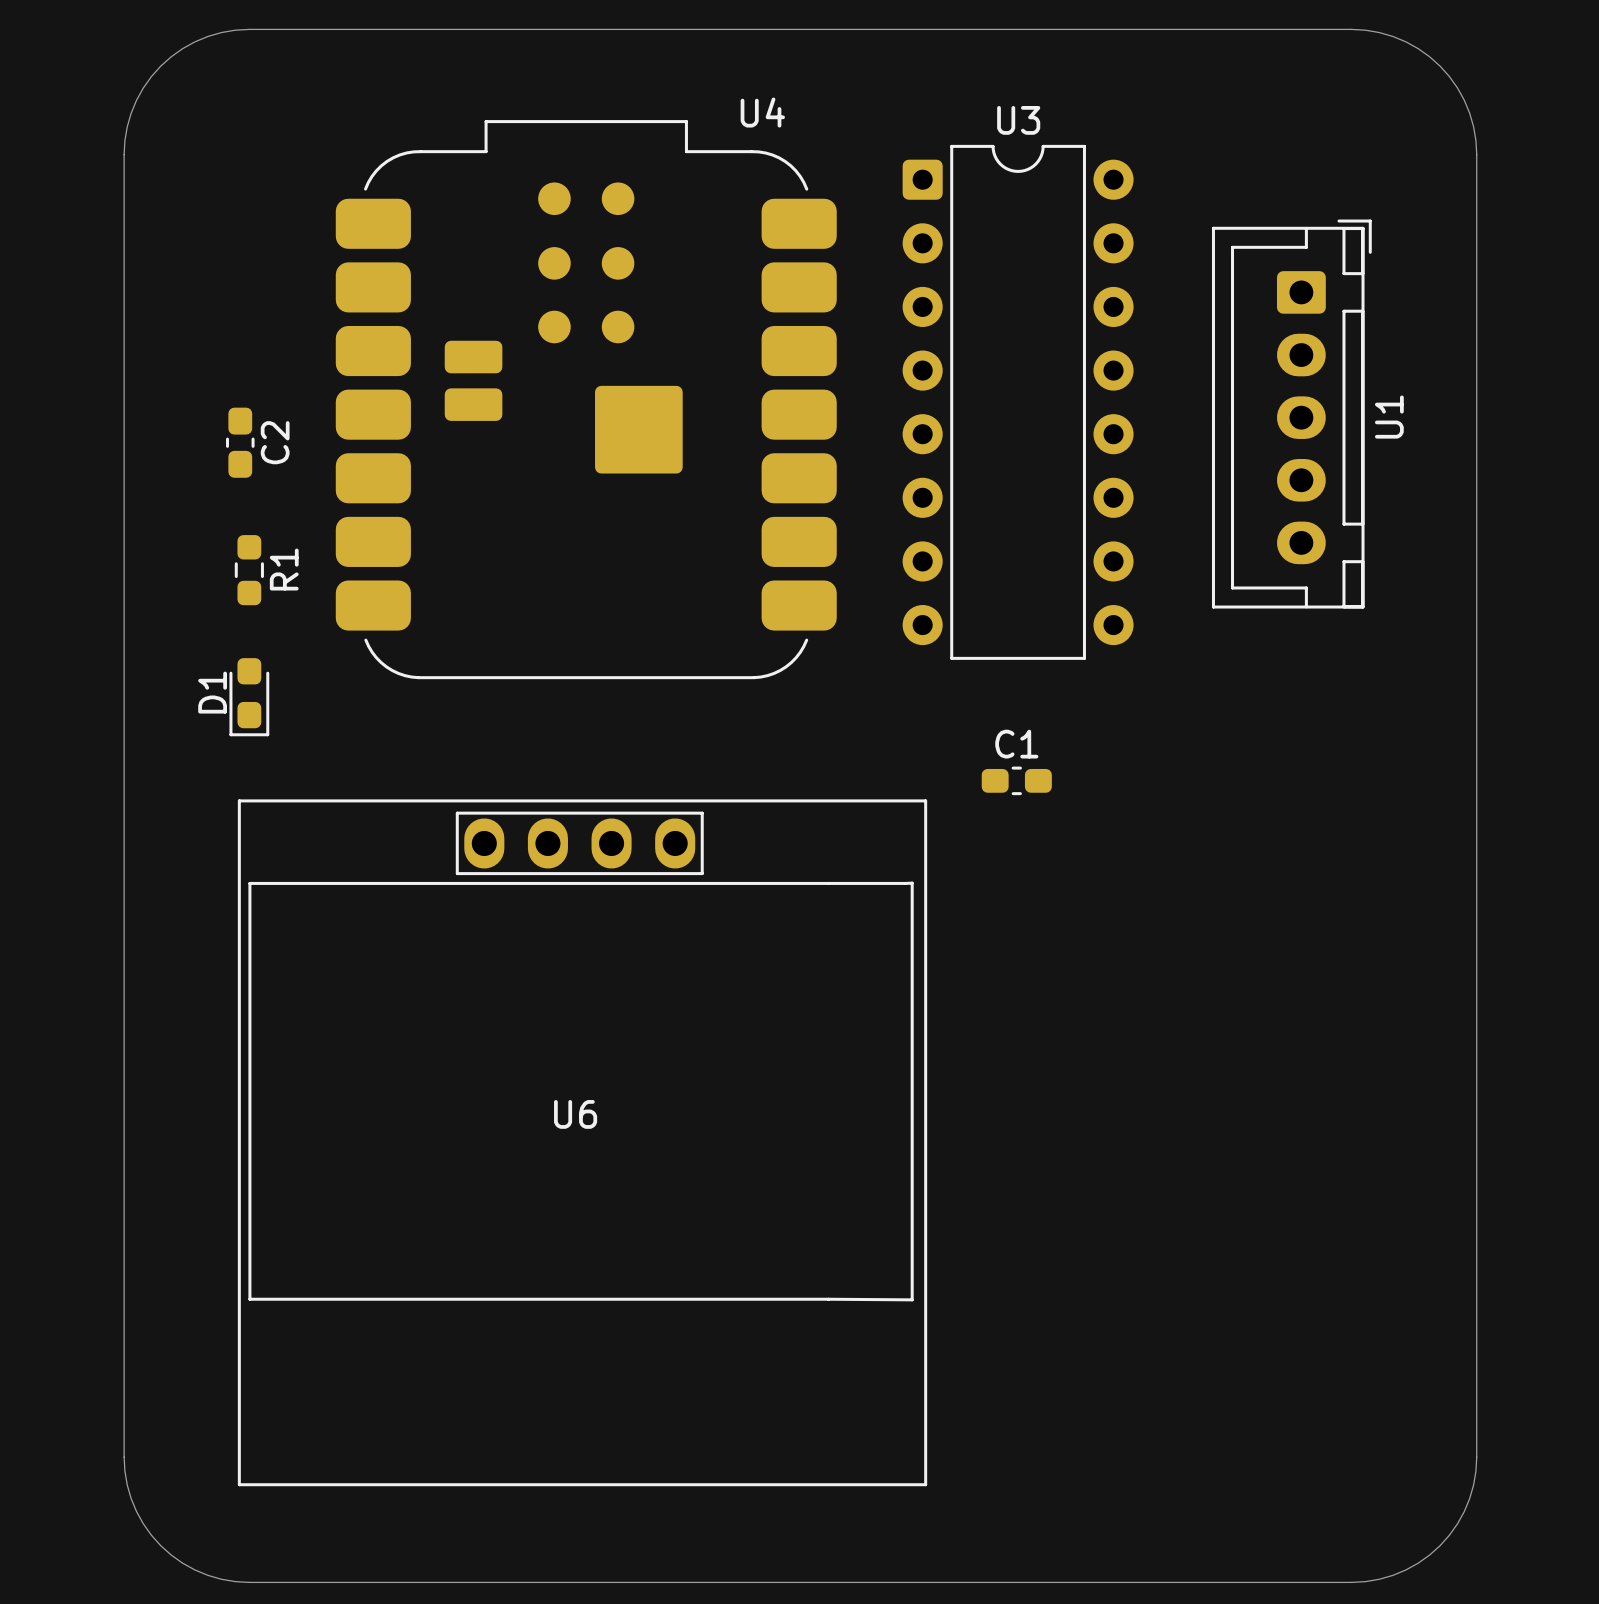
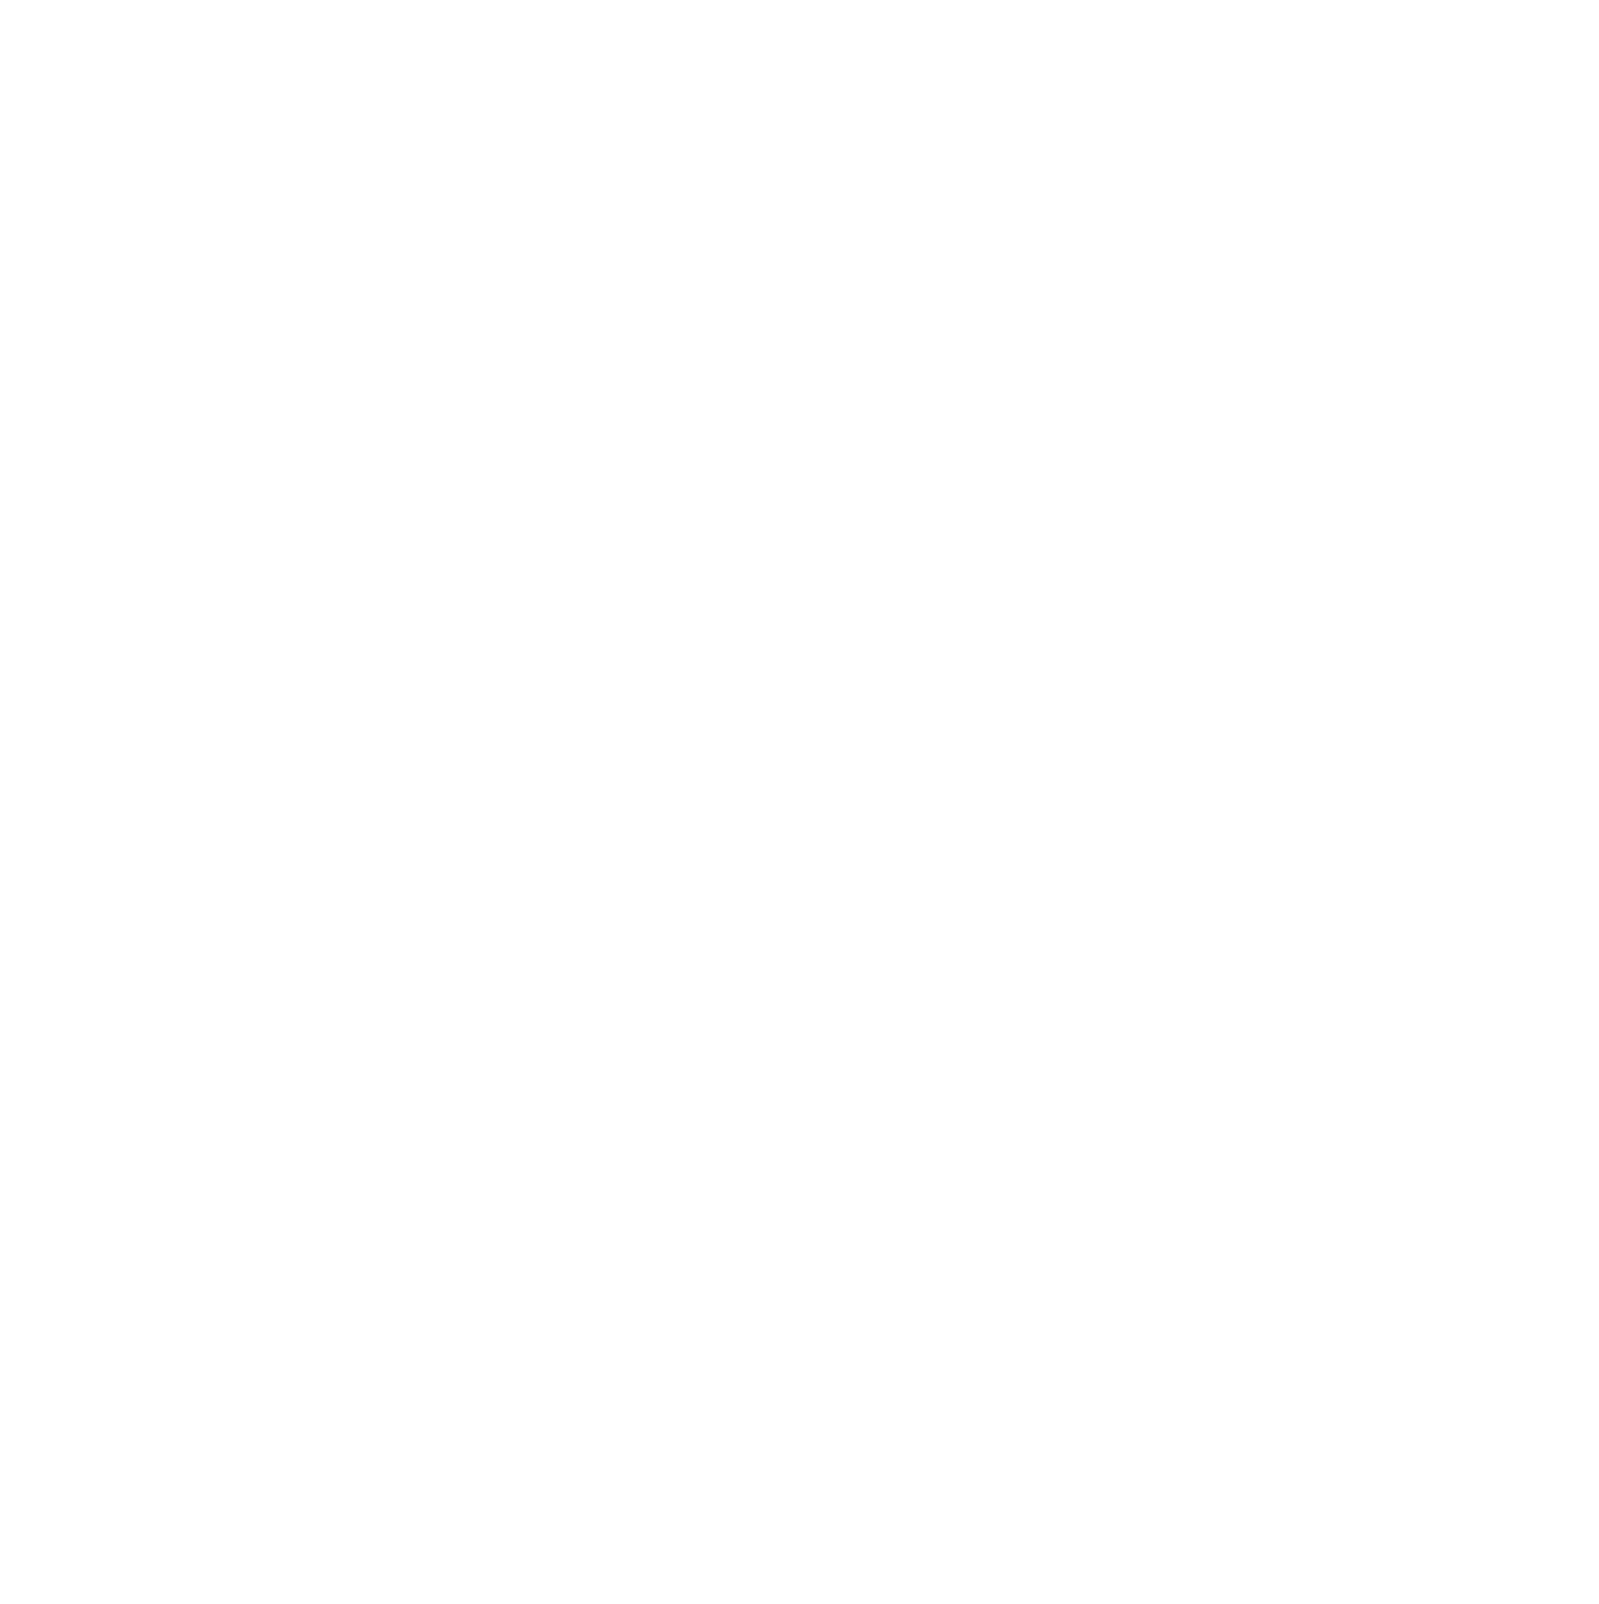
board edge: (249, 29) (1351, 29) (1379, 32) (1405, 41) (1429, 56) (1449, 76) (1457, 88) (1469, 113) (1475, 140) (1476, 154) (1476, 1457) (1473, 1485) (1464, 1511) (1449, 1535) (1429, 1555) (1418, 1563) (1392, 1575) (1379, 1579) (1351, 1582) (249, 1582) (221, 1579) (195, 1570) (171, 1555) (151, 1535) (136, 1511) (131, 1498) (124, 1471) (124, 1457) (124, 140) (127, 126) (136, 100) (151, 76) (160, 66) (171, 56) (195, 41) (221, 32) (249, 29) -> none
U4: (586, 399) -> none
U3: (1018, 402) -> none
U1: (1291, 414) -> none
C2: (240, 442) -> none
R1: (249, 570) -> none
D1: (249, 697) -> none
C1: (1016, 780) -> none
U6: (582, 1142) -> none

